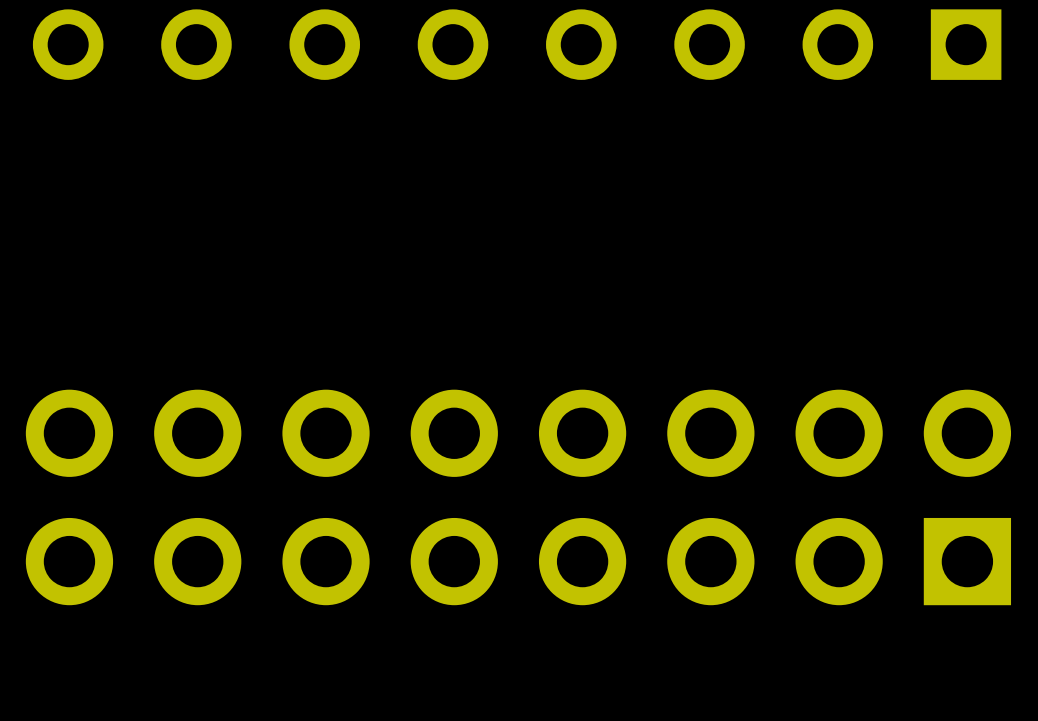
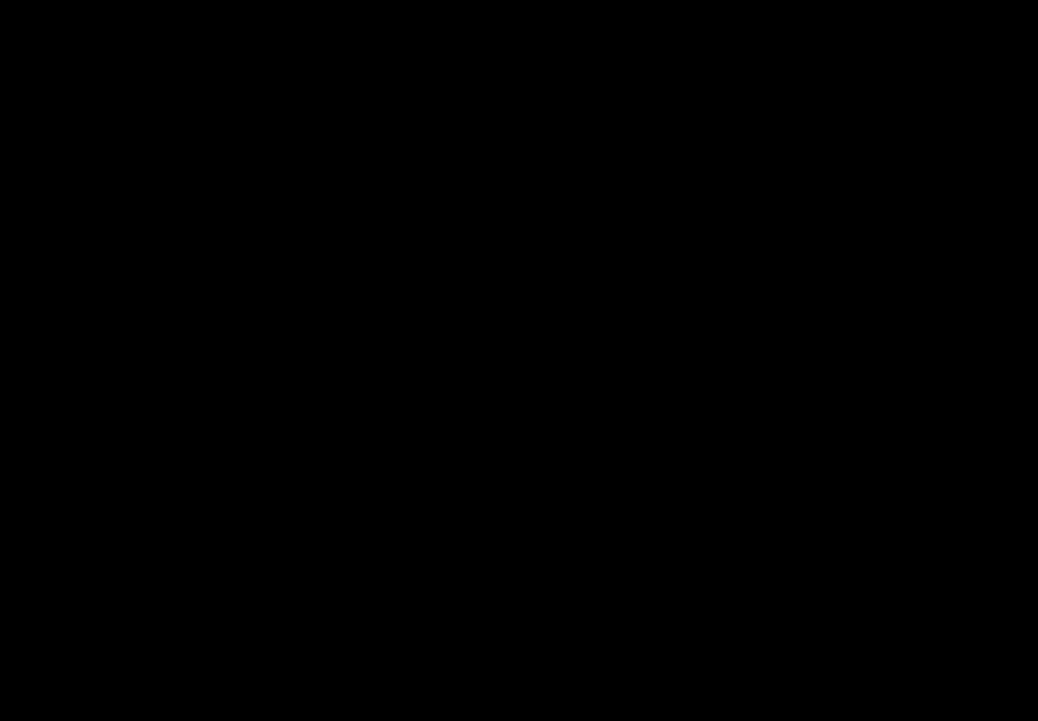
part: (517, 44) -> none
part: (518, 497) -> none

